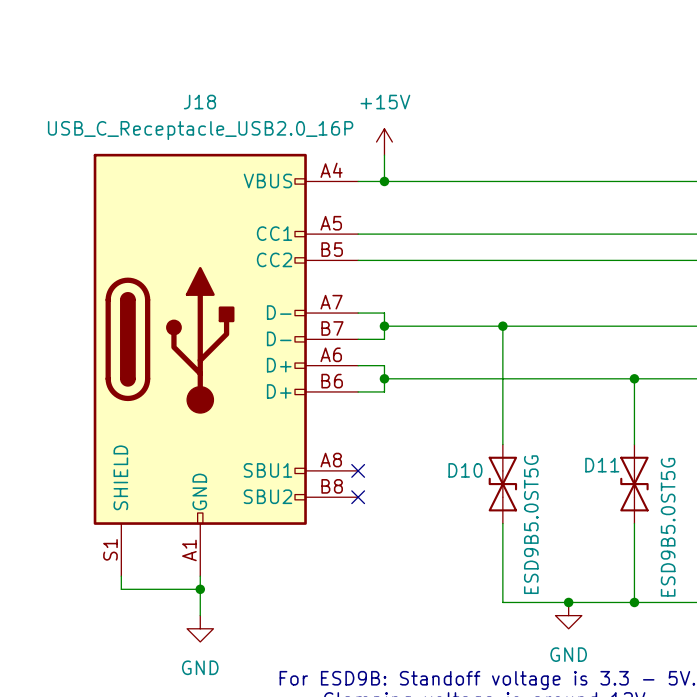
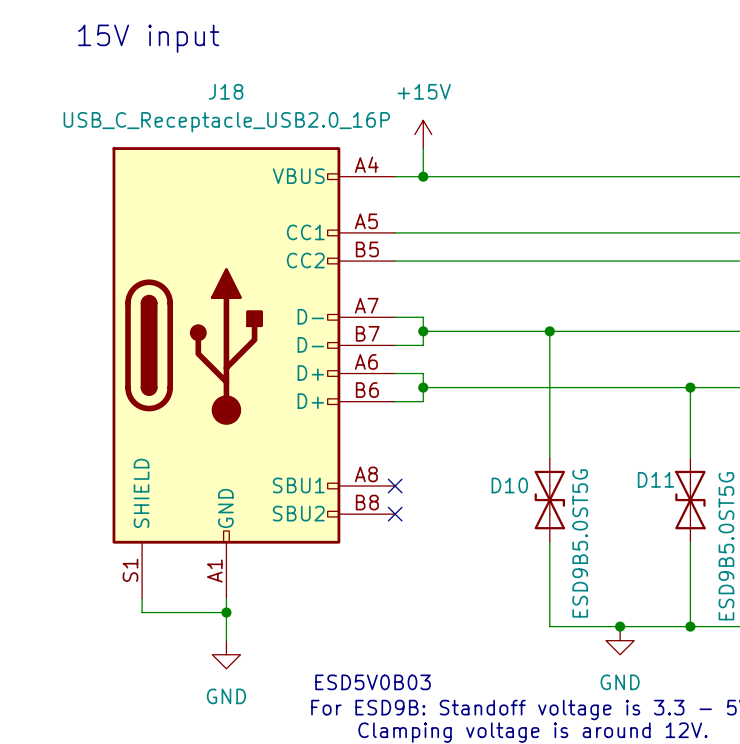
text: none -> 15V input (148, 38)
text: none -> ESD5V0B03 (372, 682)

